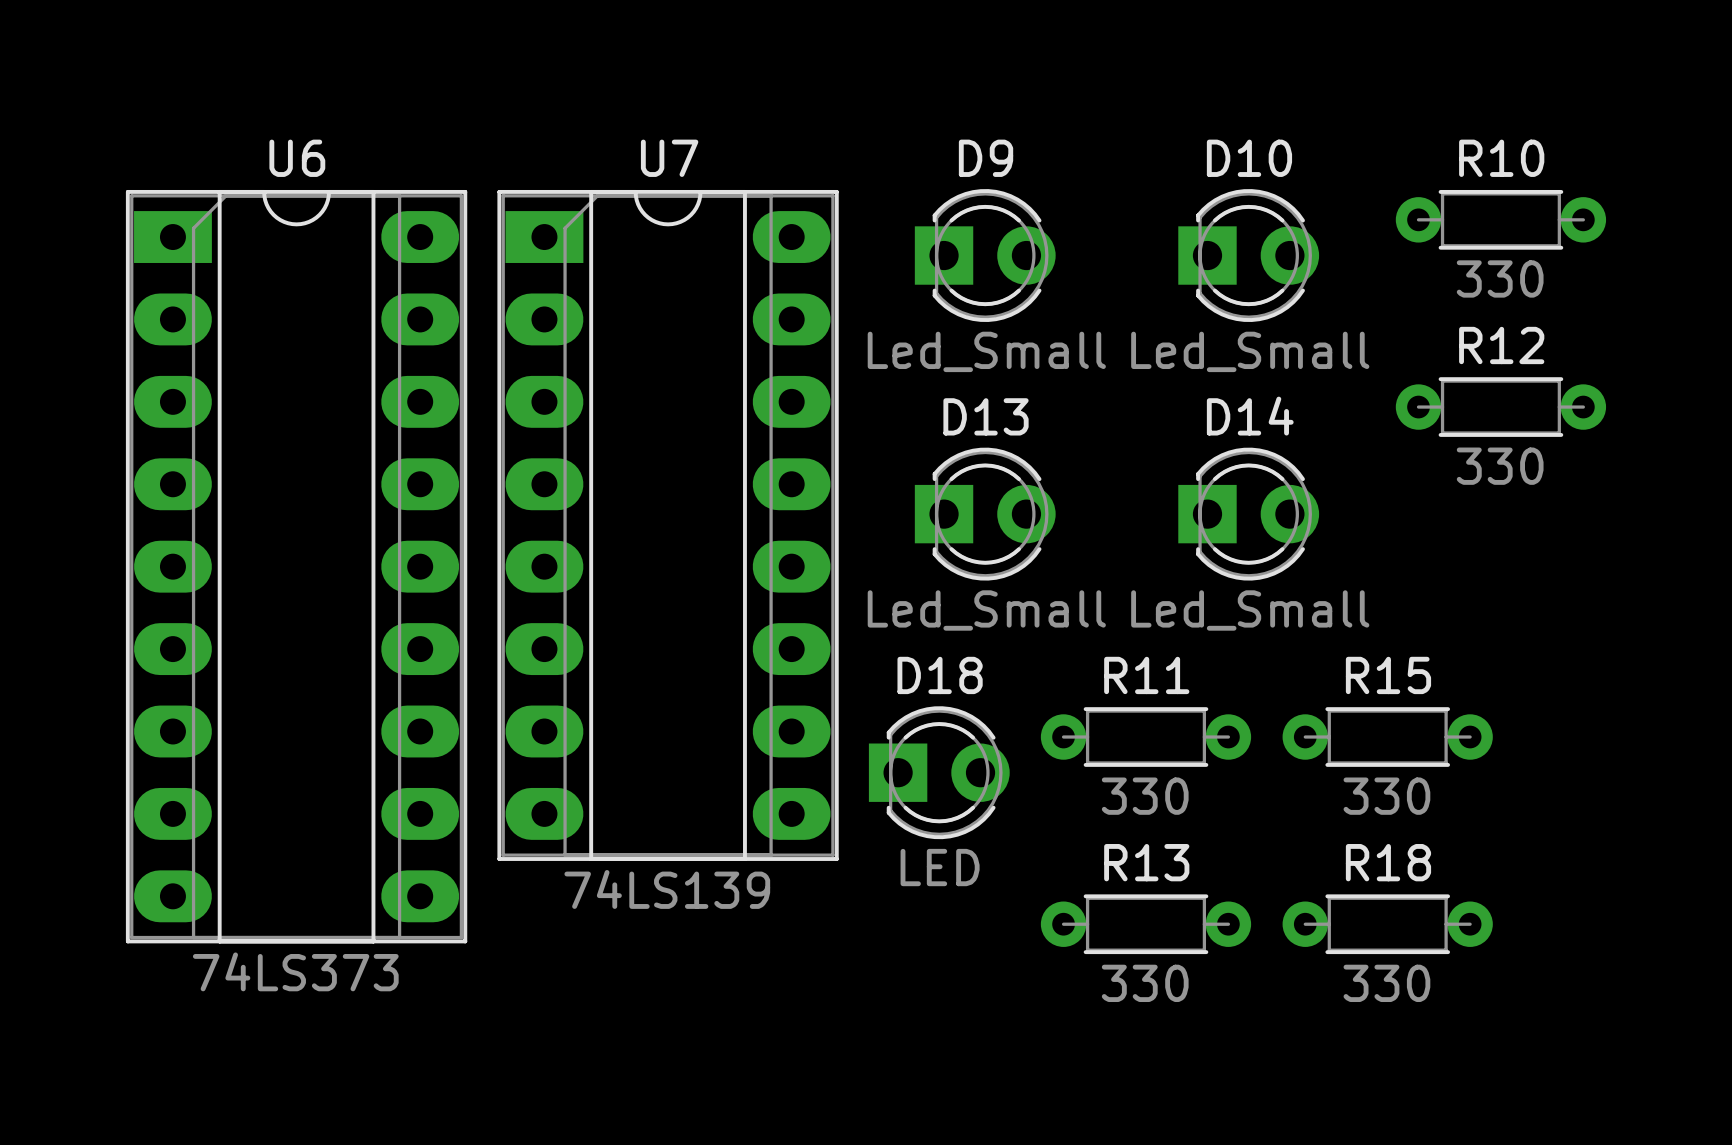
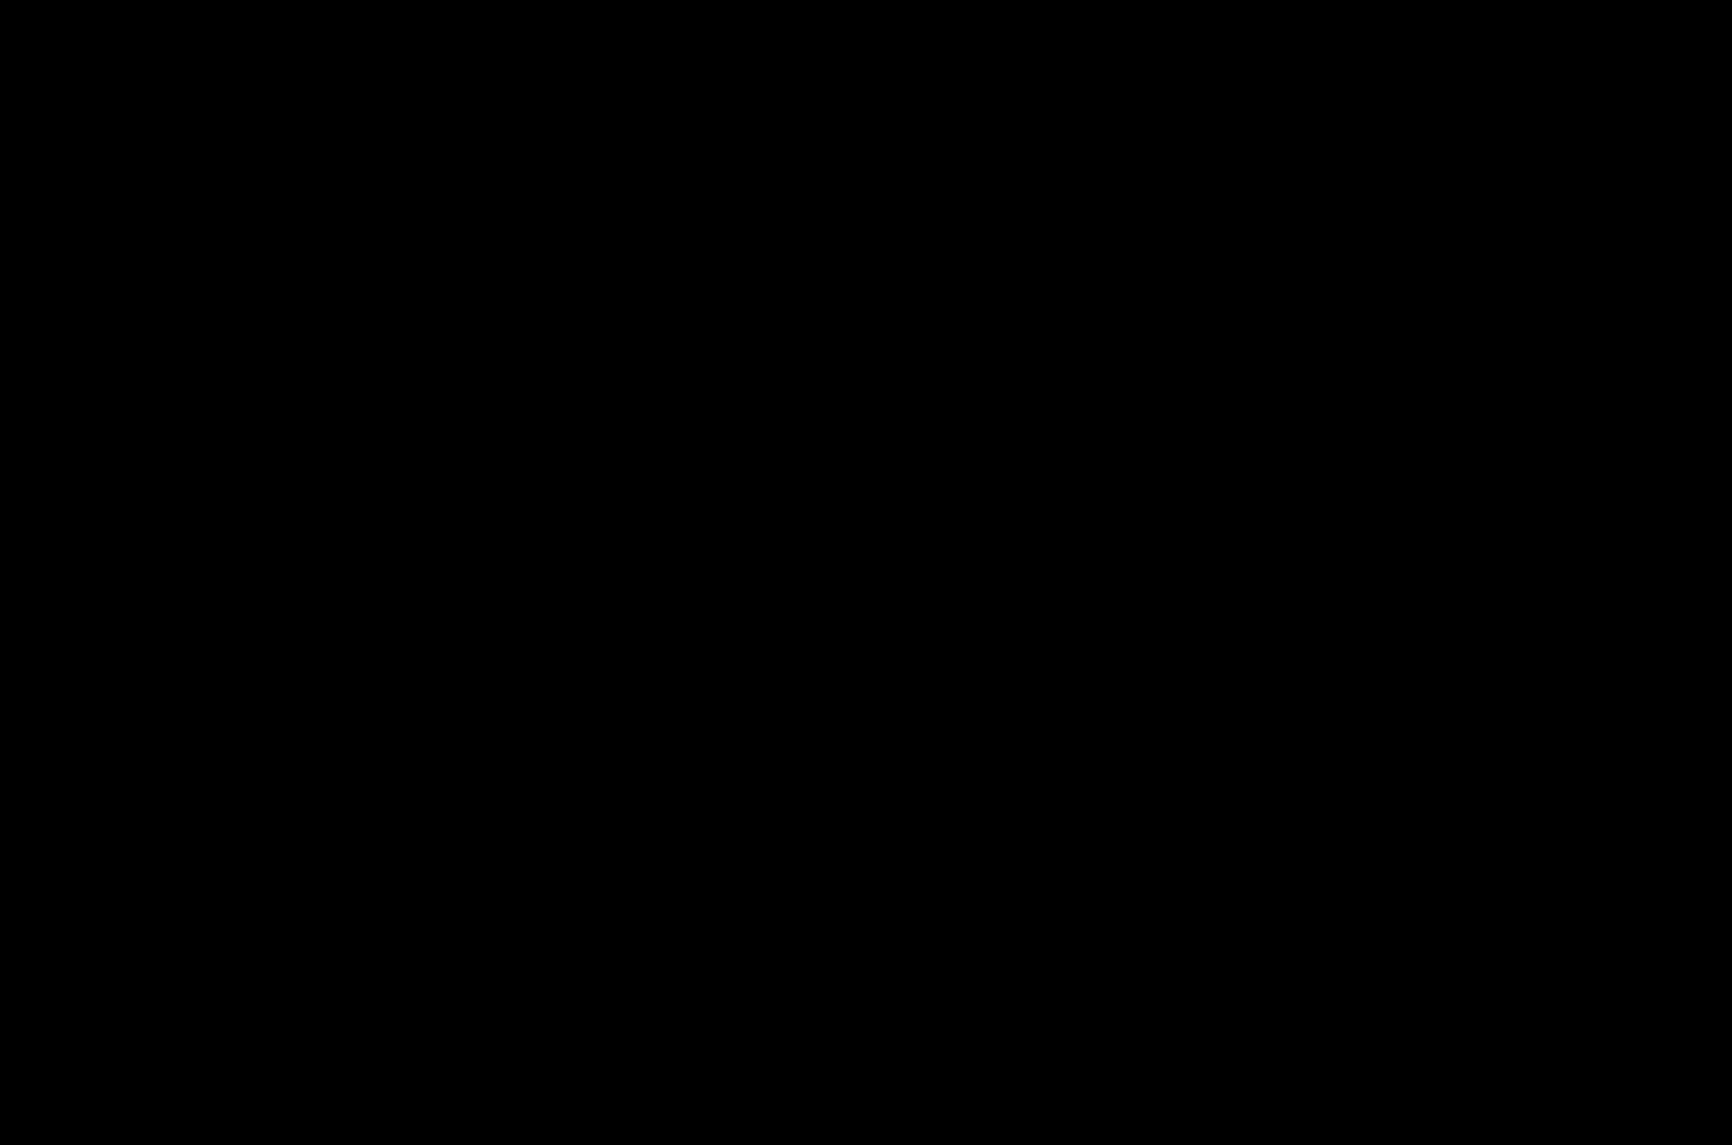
R10: 330 (1500, 219) -> none
D9: Led_Small (985, 255) -> none
D10: Led_Small (1248, 255) -> none
R12: 330 (1500, 407) -> none
D13: Led_Small (985, 514) -> none
D14: Led_Small (1248, 514) -> none
U7: 74LS139 (668, 525) -> none
U6: 74LS373 (296, 566) -> none
R11: 330 (1145, 737) -> none
R15: 330 (1387, 737) -> none
D18: LED (939, 772) -> none
R13: 330 (1145, 924) -> none
R18: 330 (1387, 924) -> none

